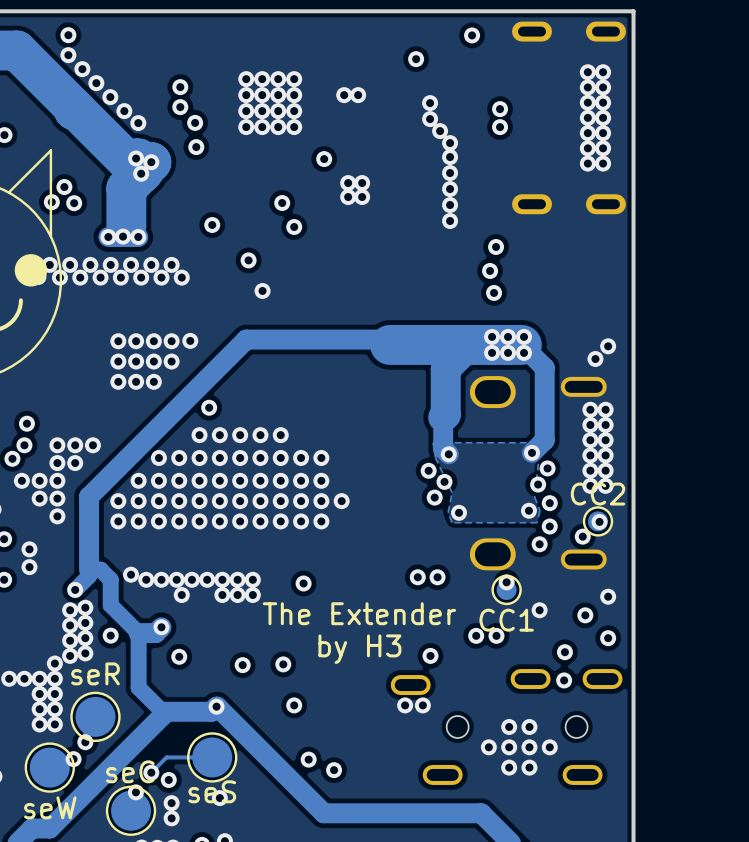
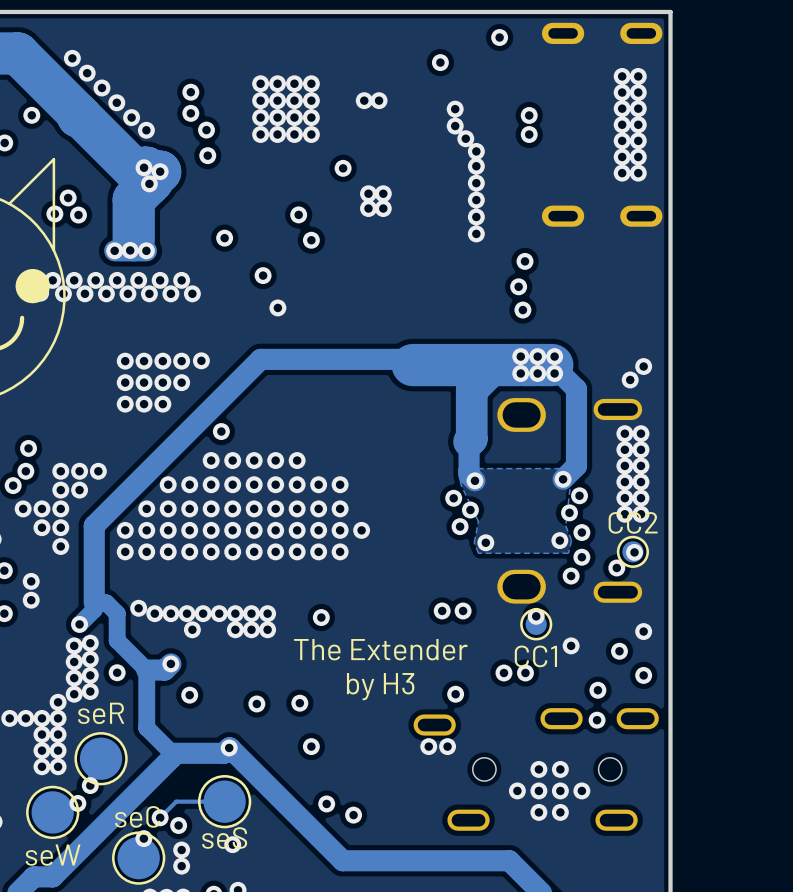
via: (68, 35) -> none
via: none -> (31, 115)

